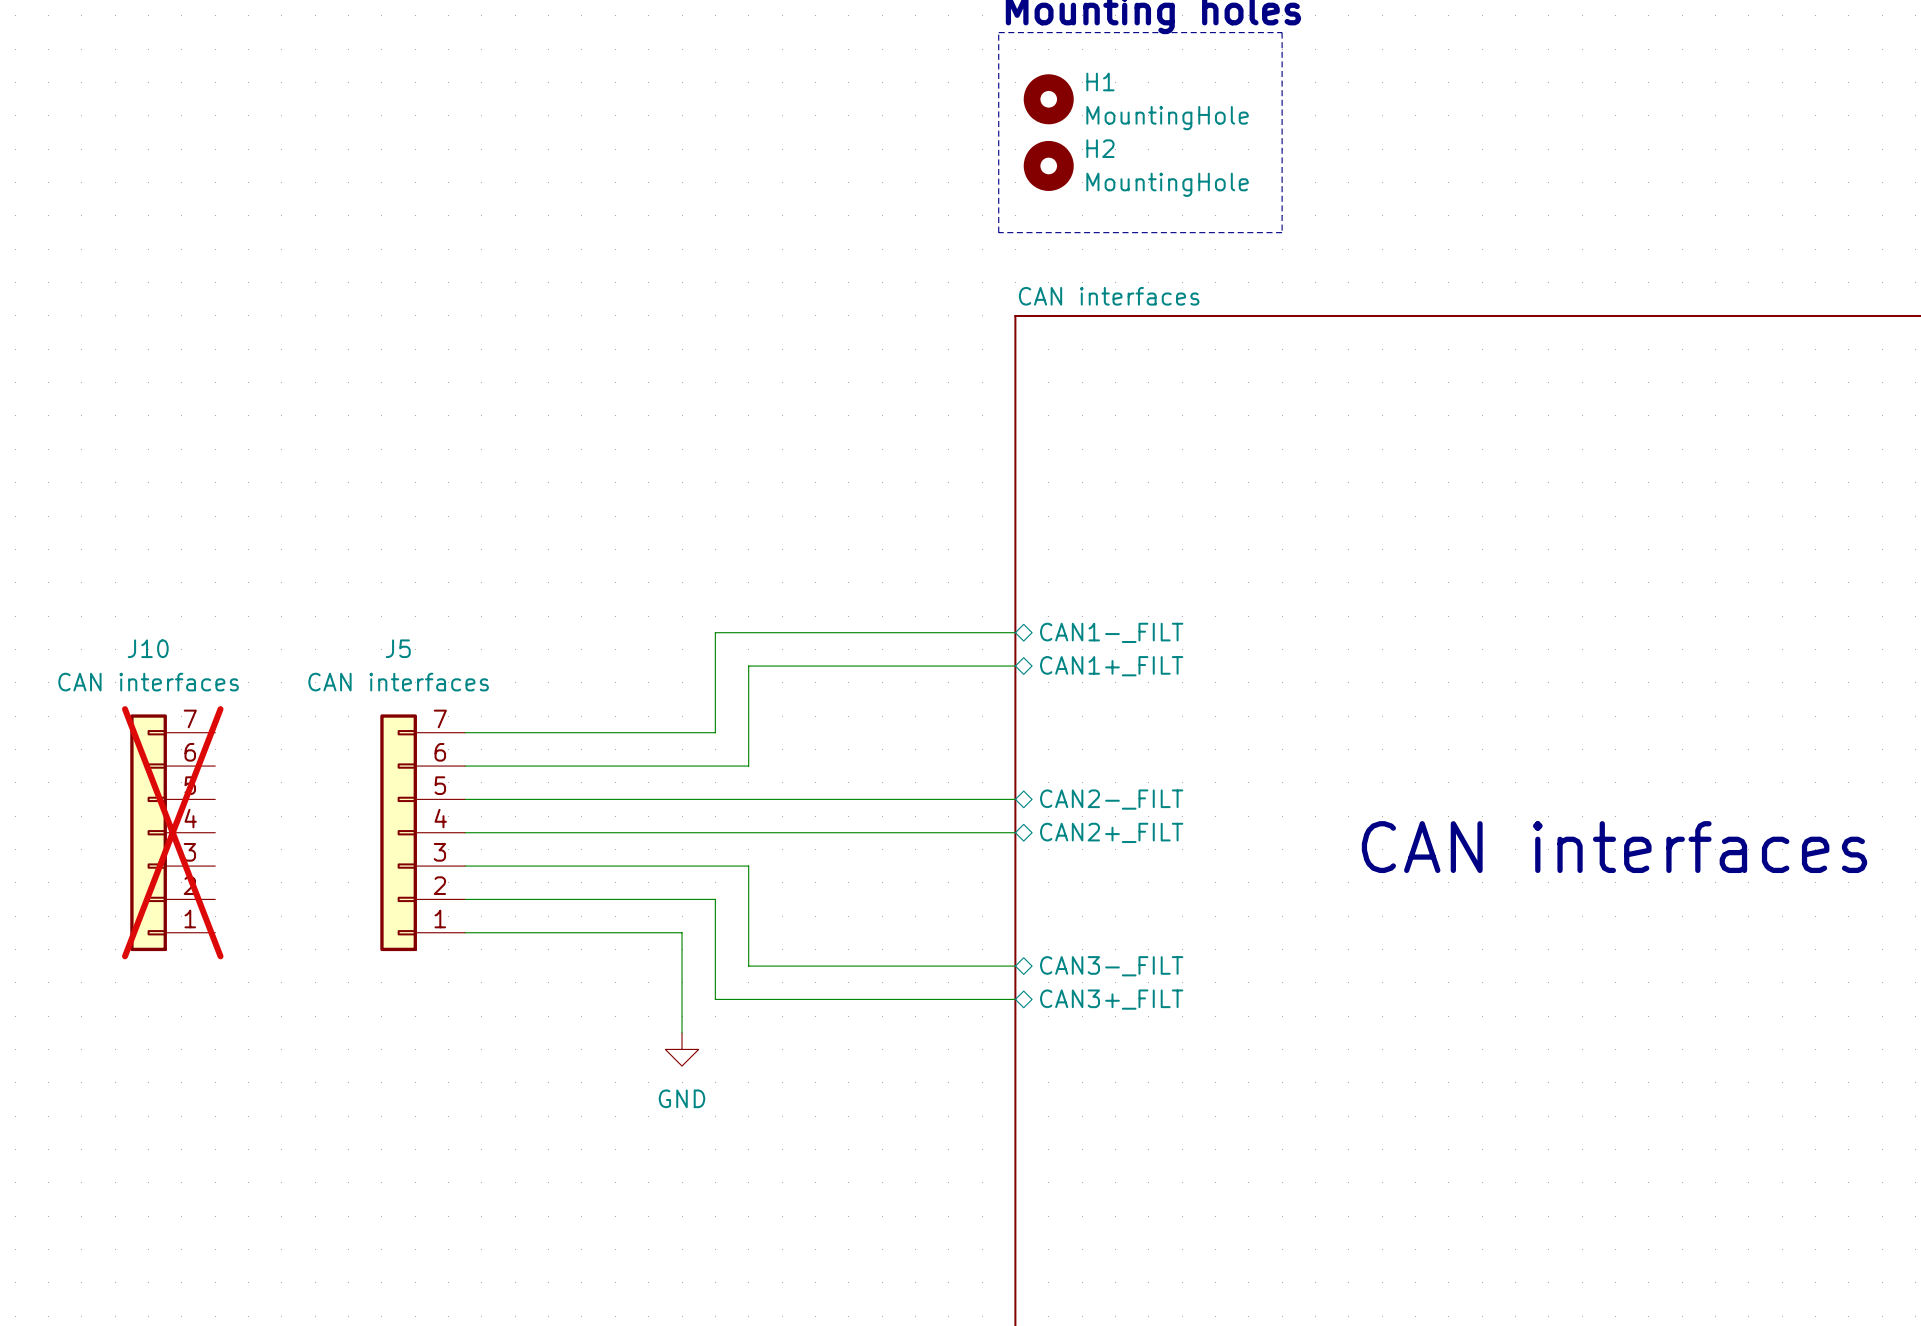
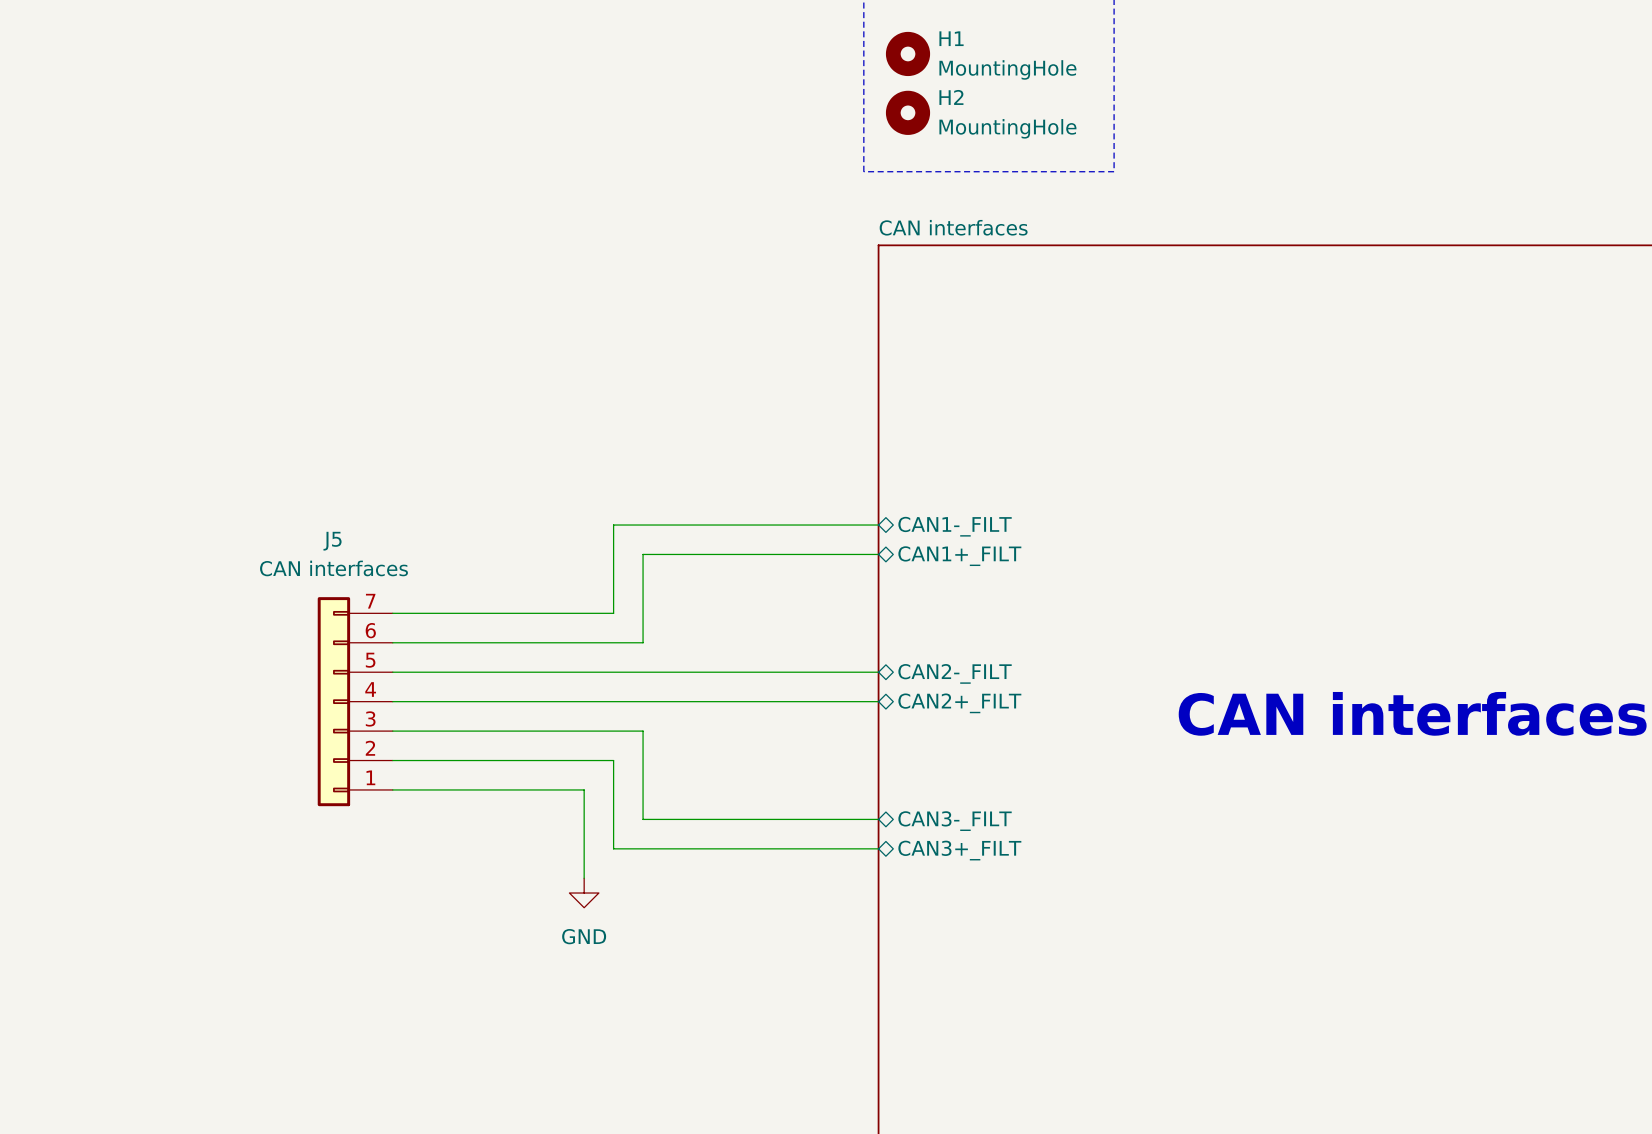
J10: CAN interfaces (172, 832) -> none

